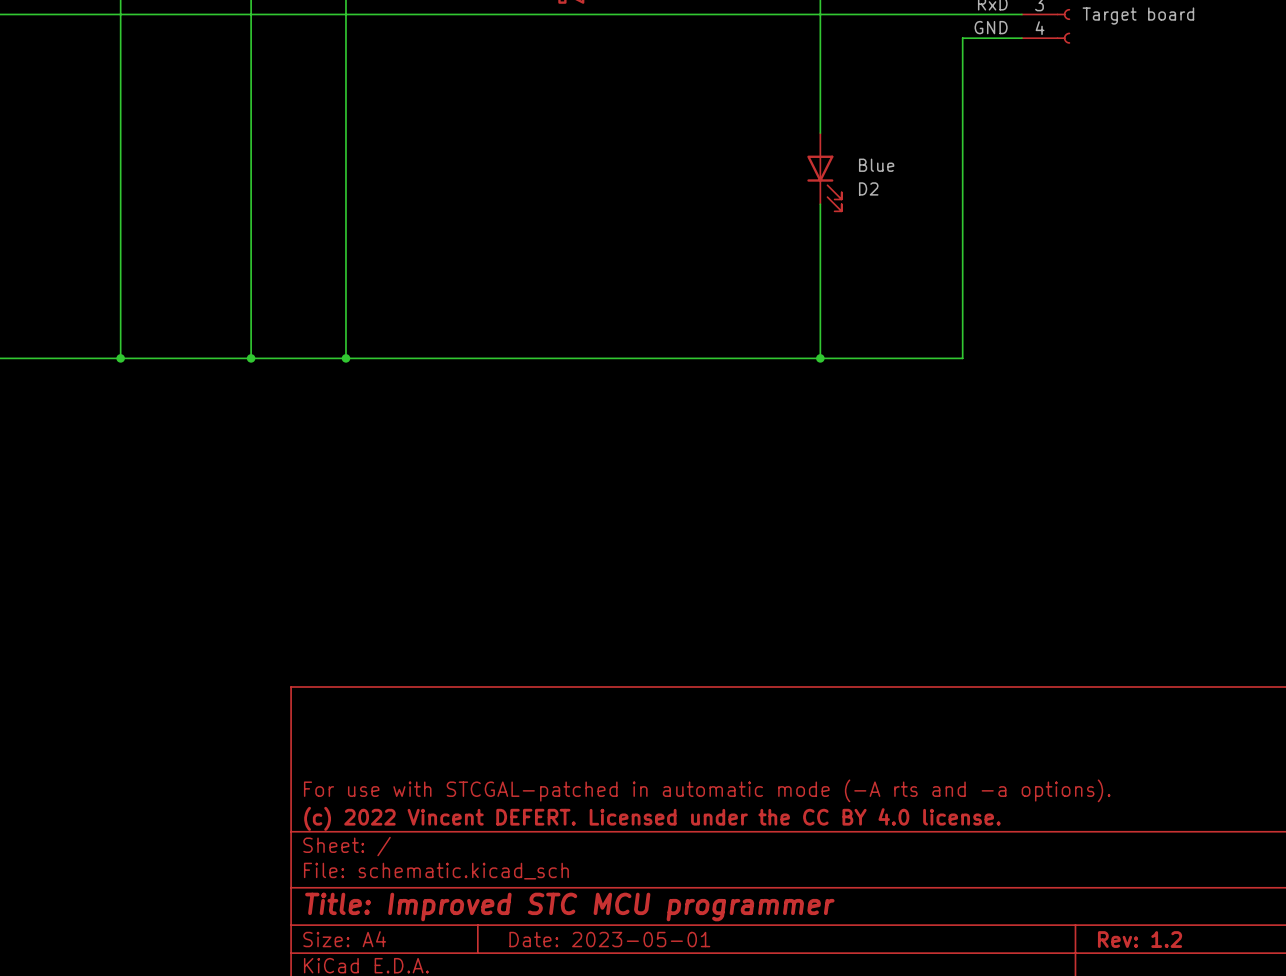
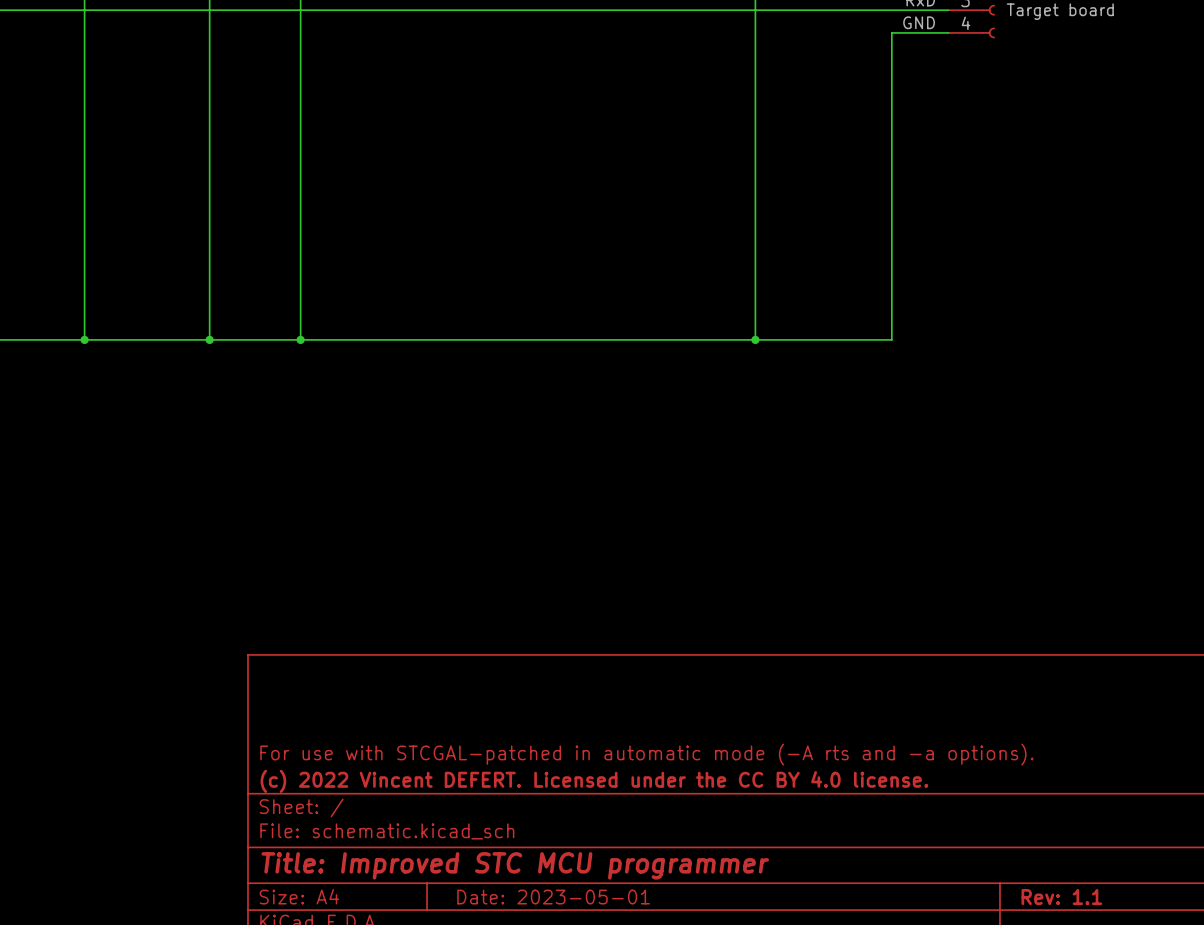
D2: Blue (824, 172) -> none
title block: Rev: 1.2 (1140, 939) -> Rev: 1.1 (1061, 897)

